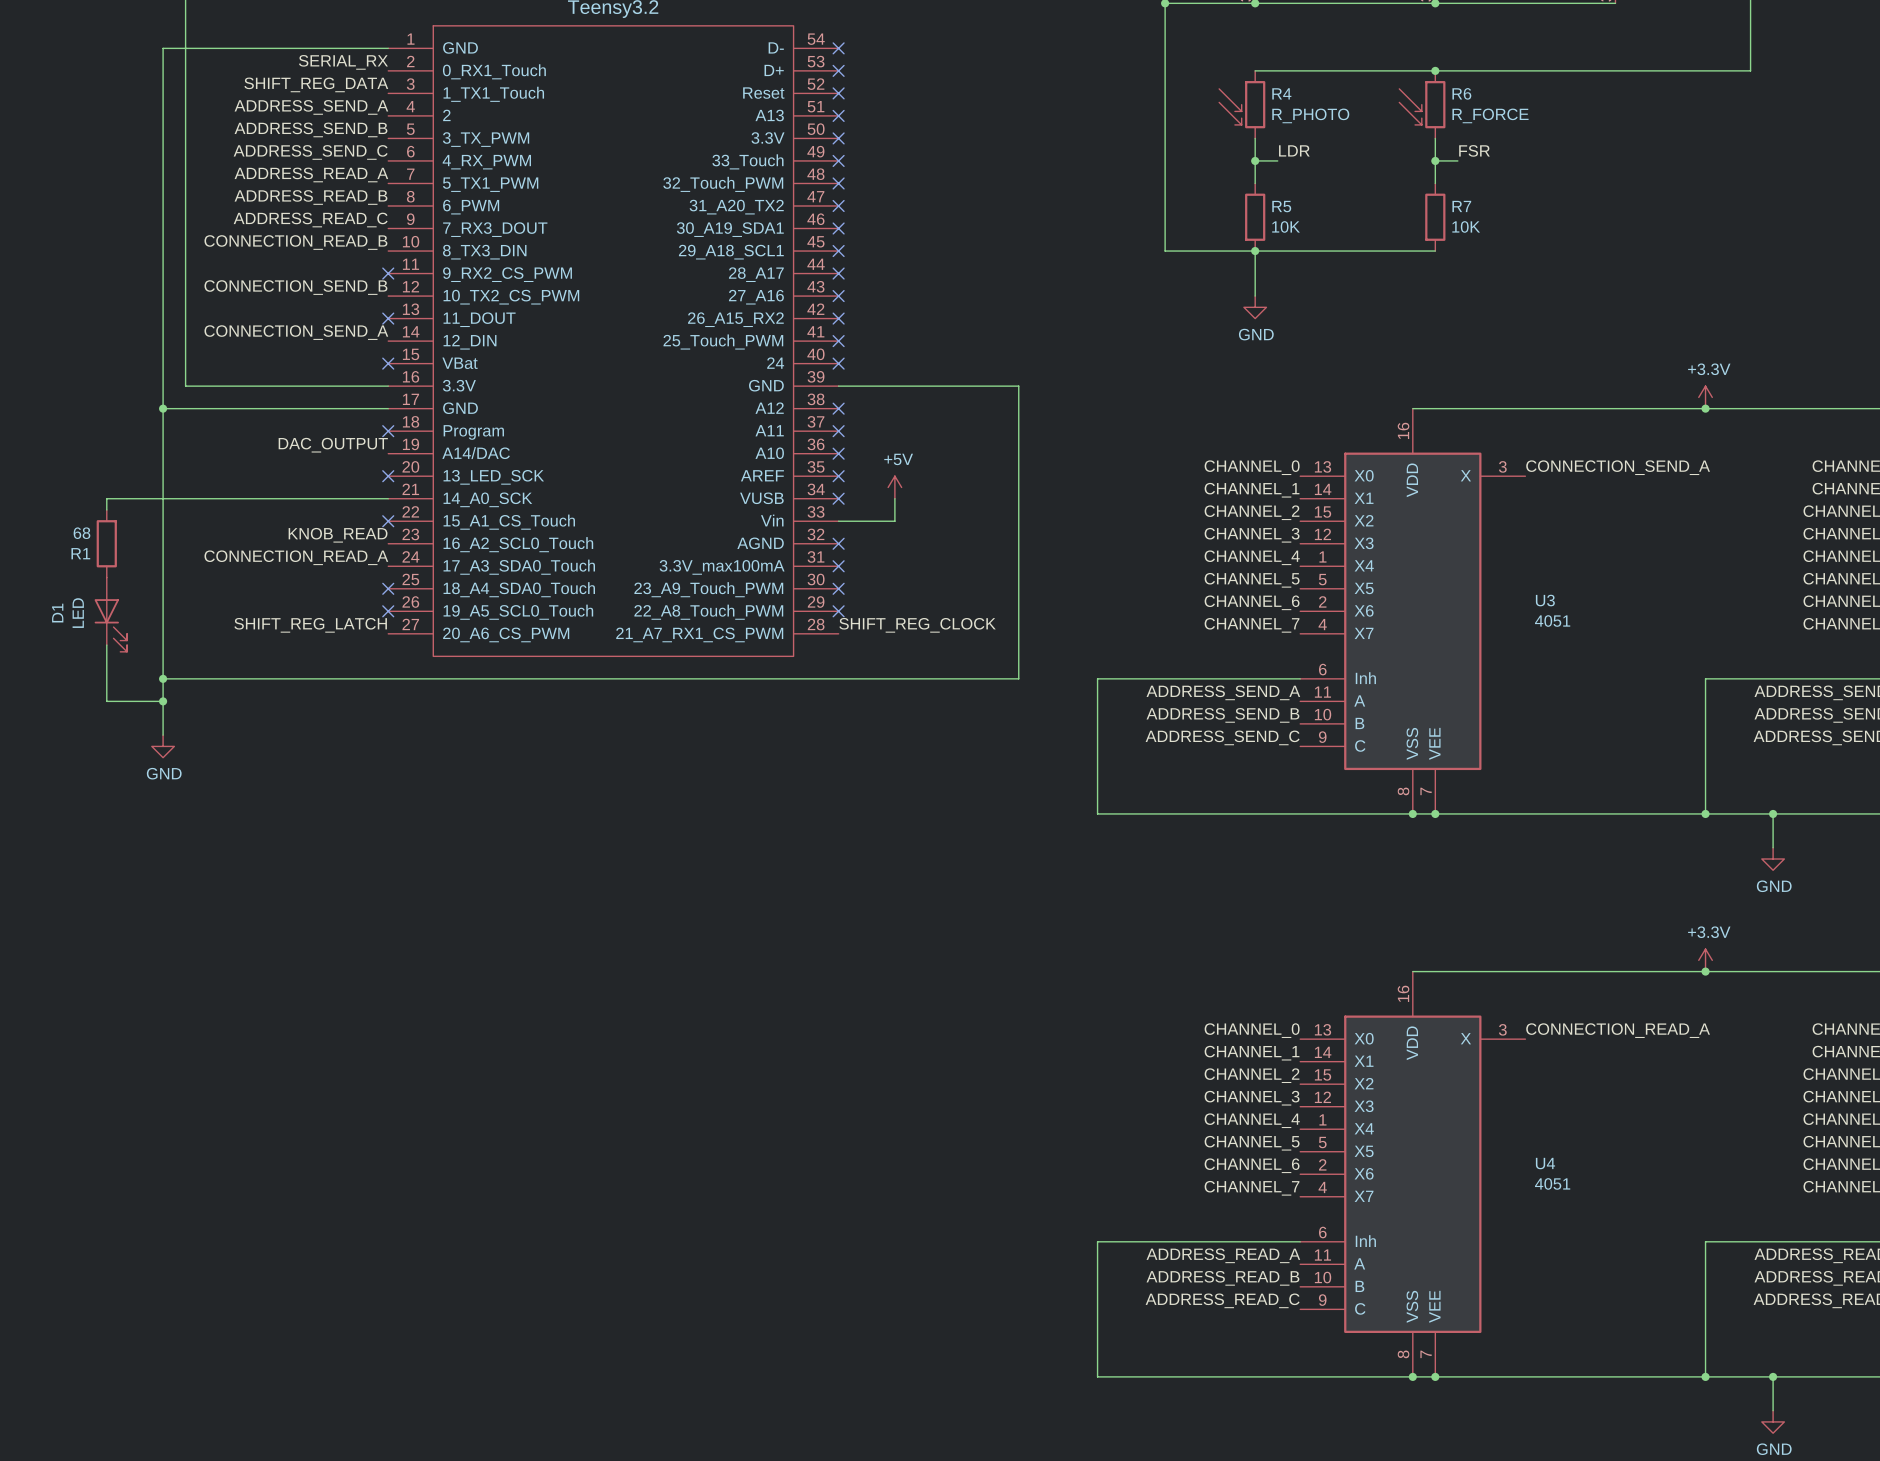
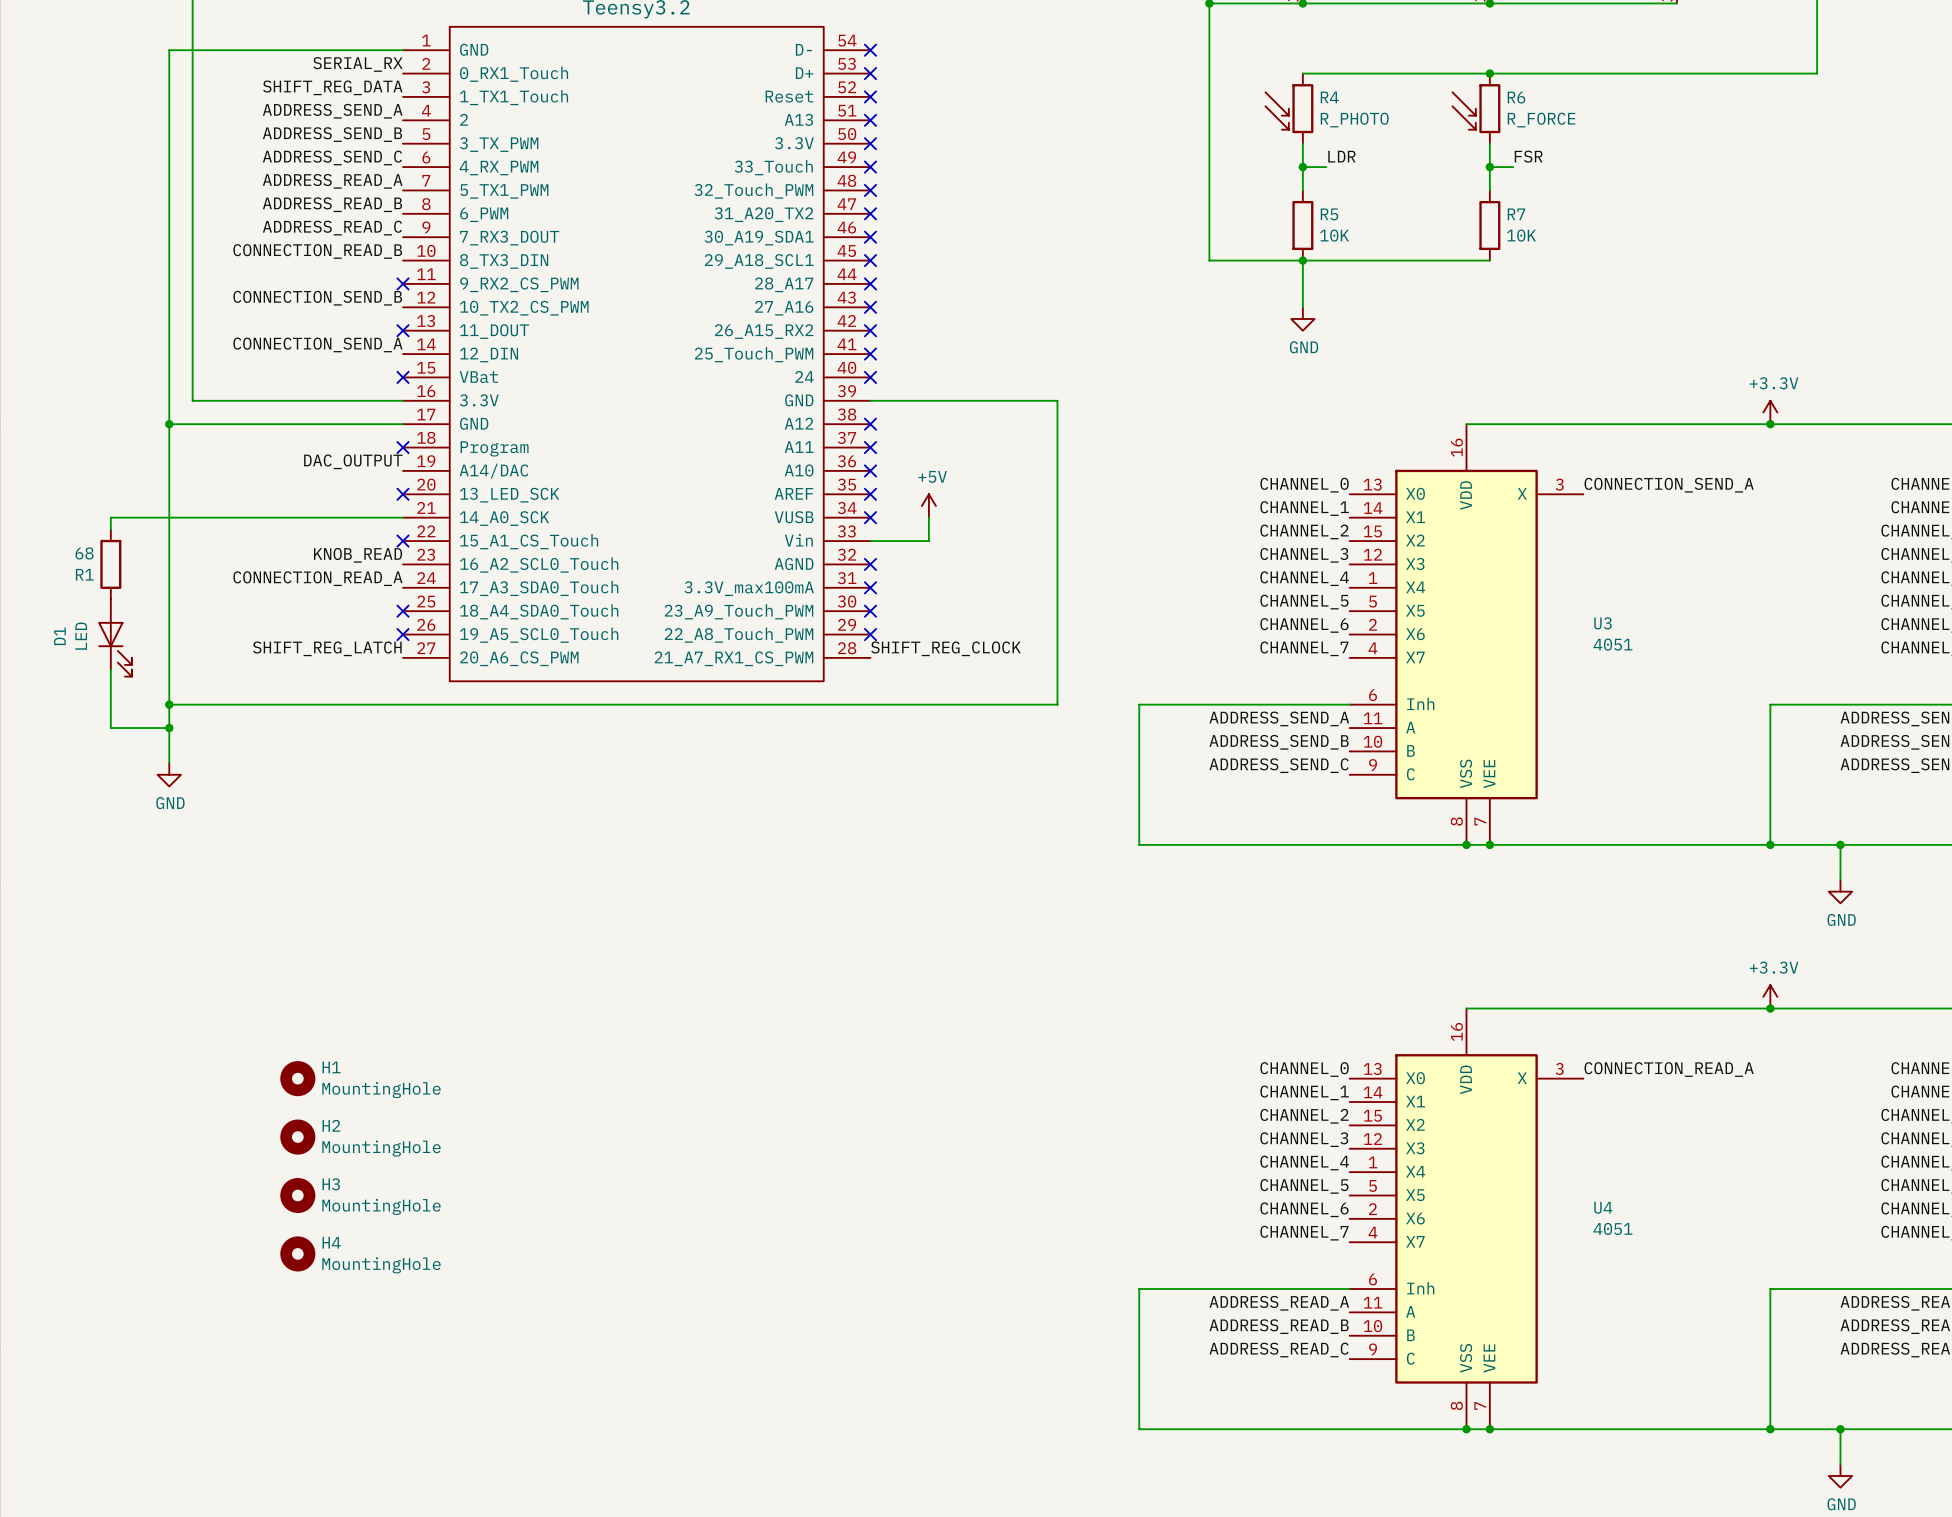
H1: none -> MountingHole (297, 1078)
H2: none -> MountingHole (297, 1137)
H3: none -> MountingHole (297, 1195)
H4: none -> MountingHole (297, 1253)

